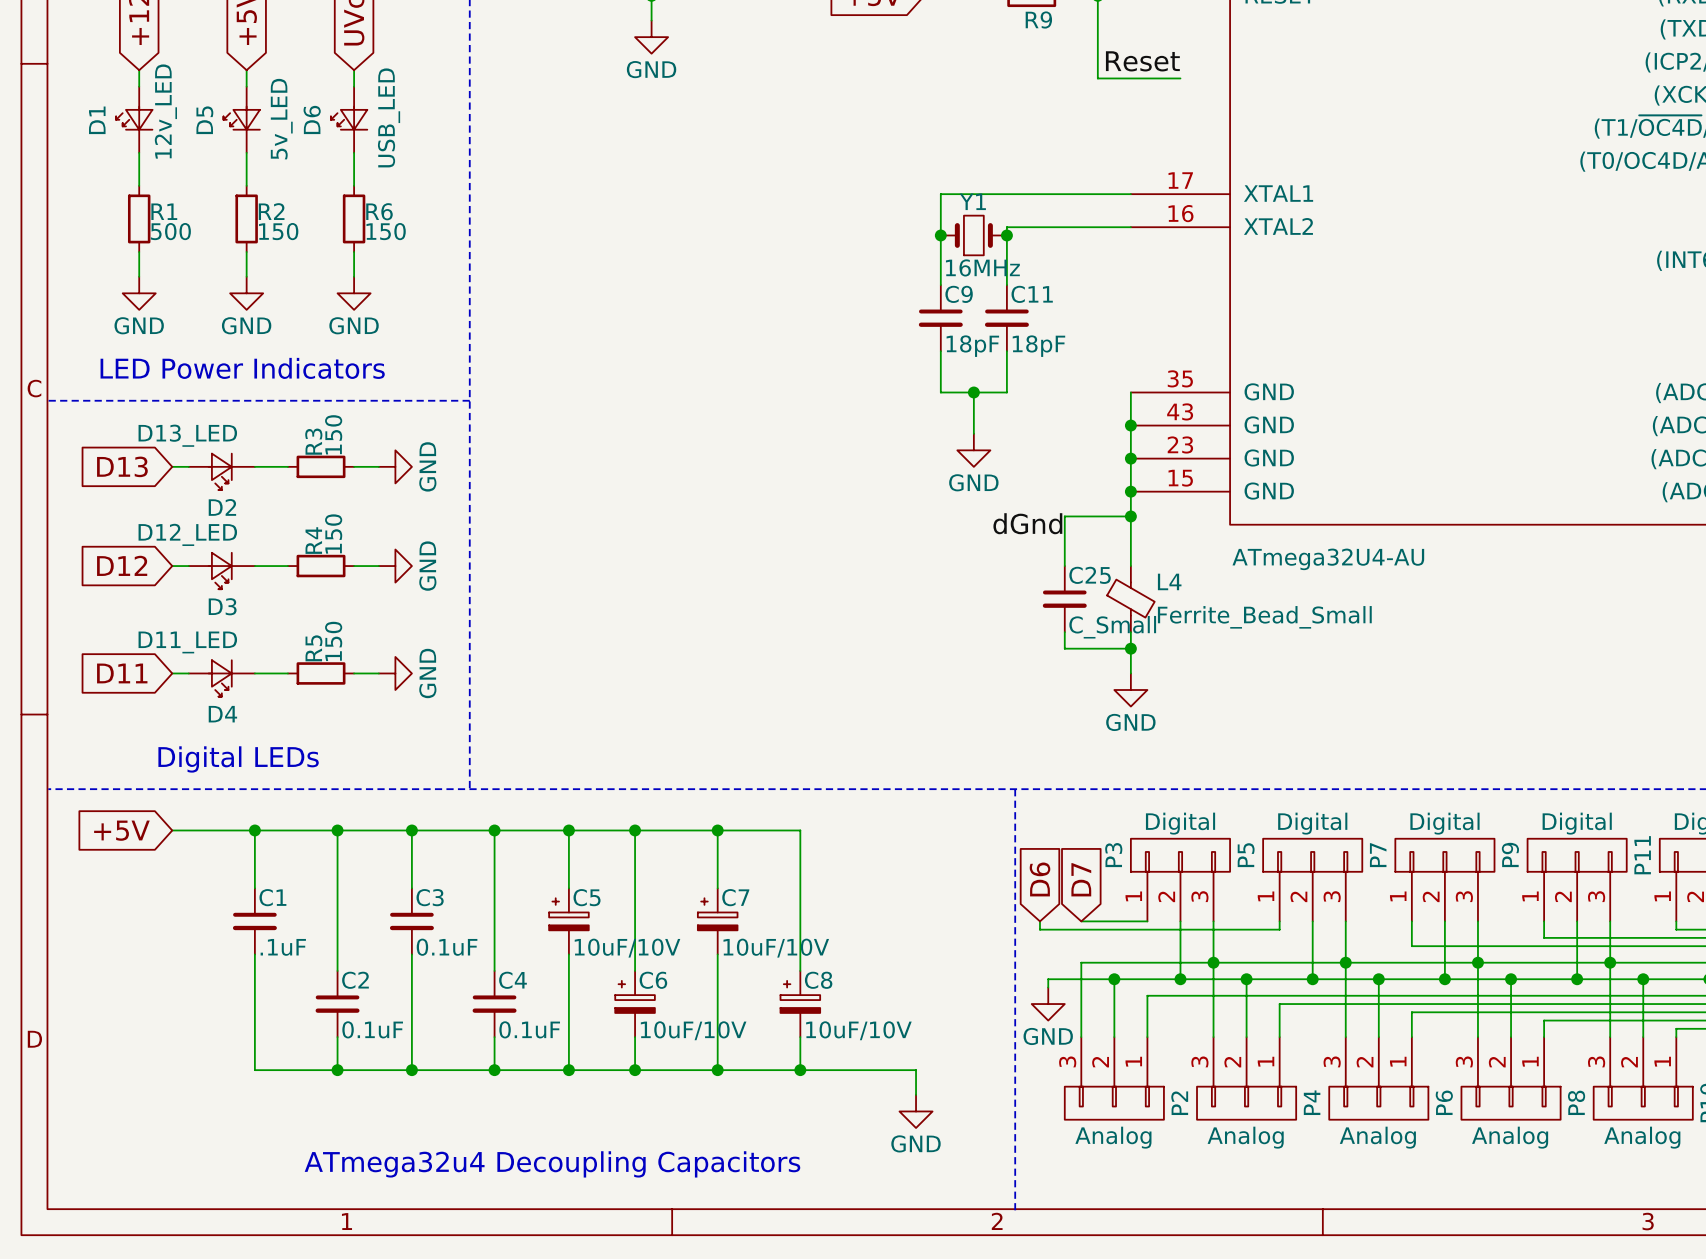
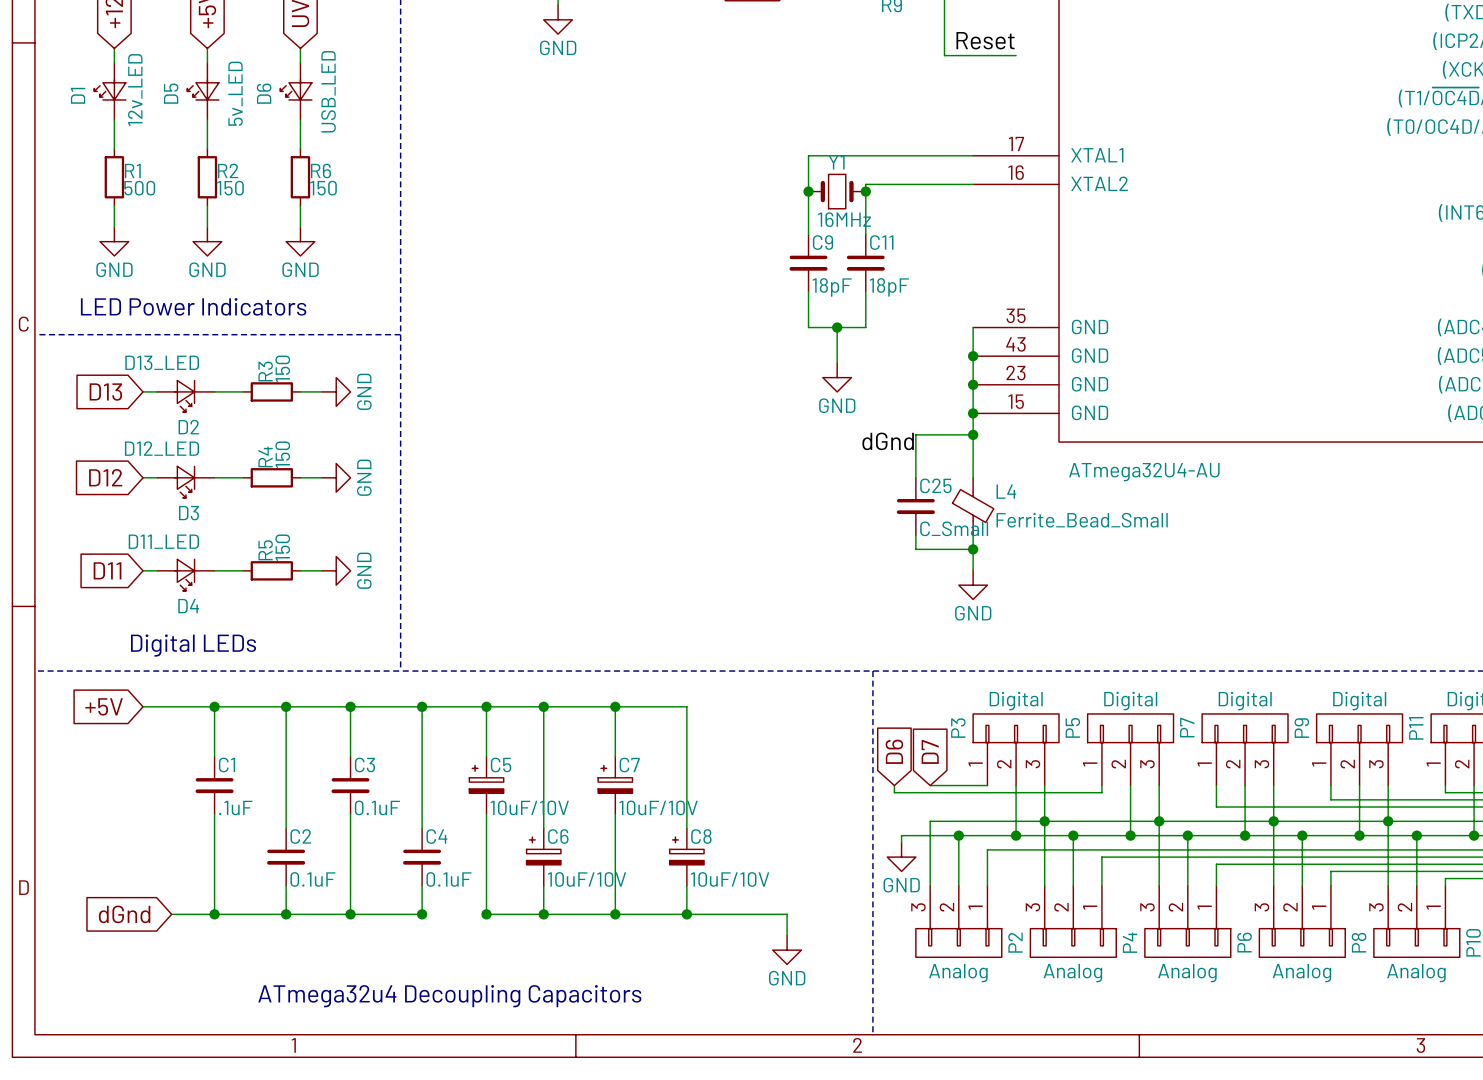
global label: none -> dGnd (124, 914)
wire: none -> (171, 914) (214, 914)
junction: none -> (214, 914)
wire: (494, 1070) (568, 1070) -> none

